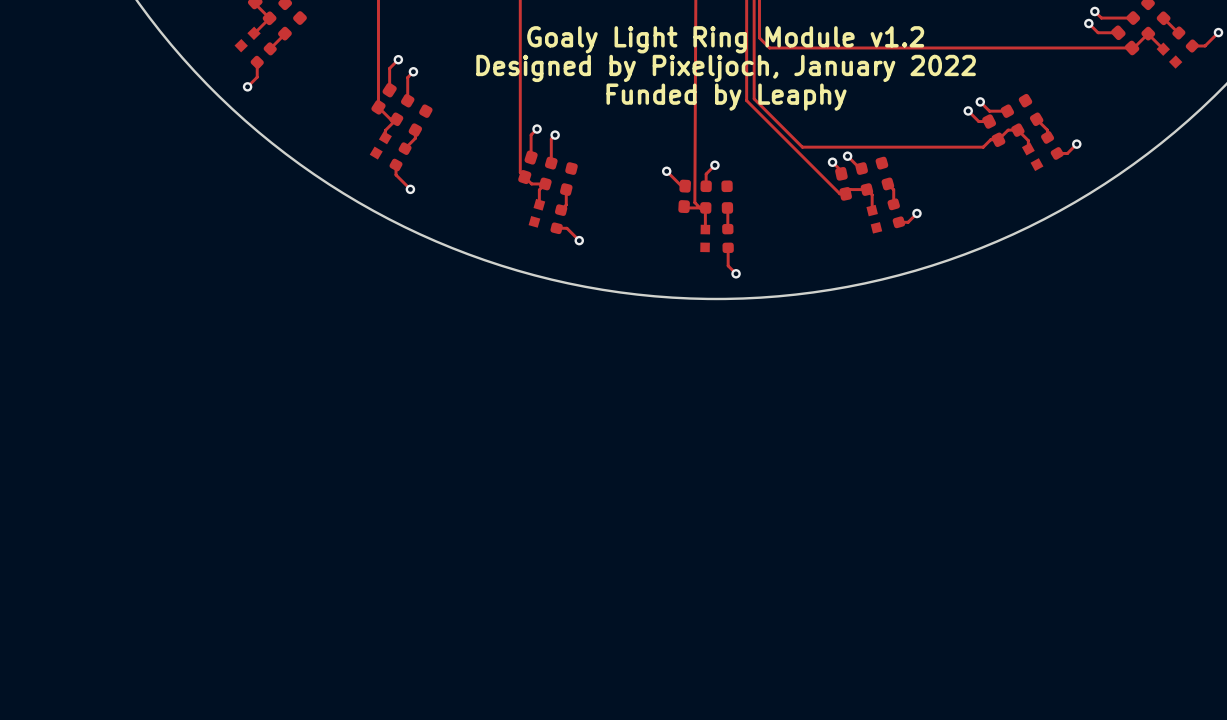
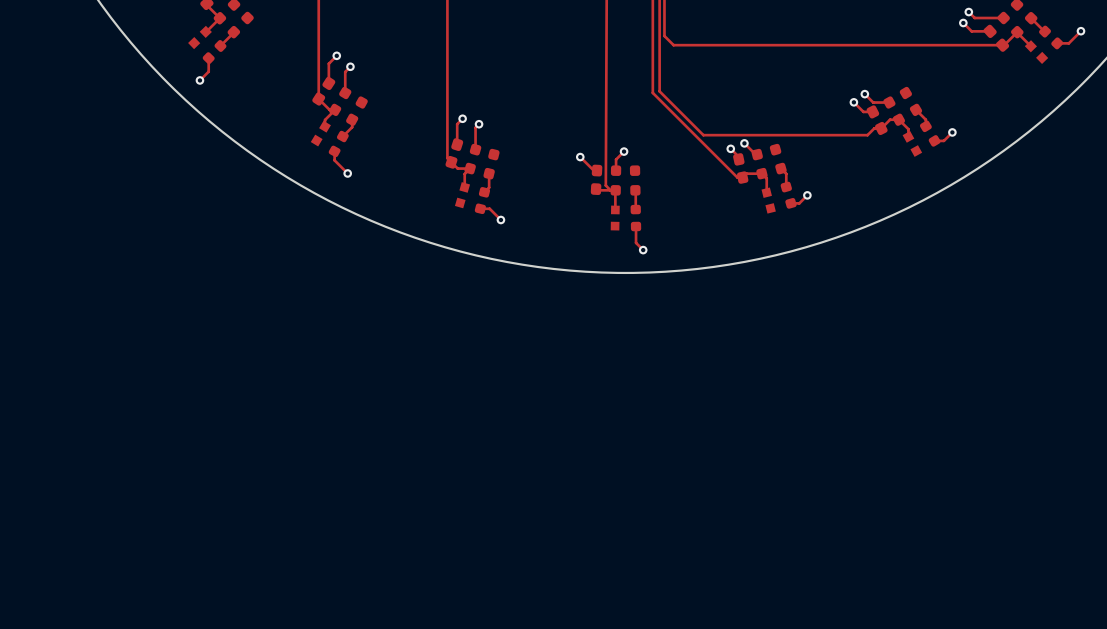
text: Goaly Light Ring Module v1.2 (725, 39) -> none
text: Designed by Pixeljoch, January 2022 (726, 68) -> none
text: Funded by Leaphy (726, 97) -> none

